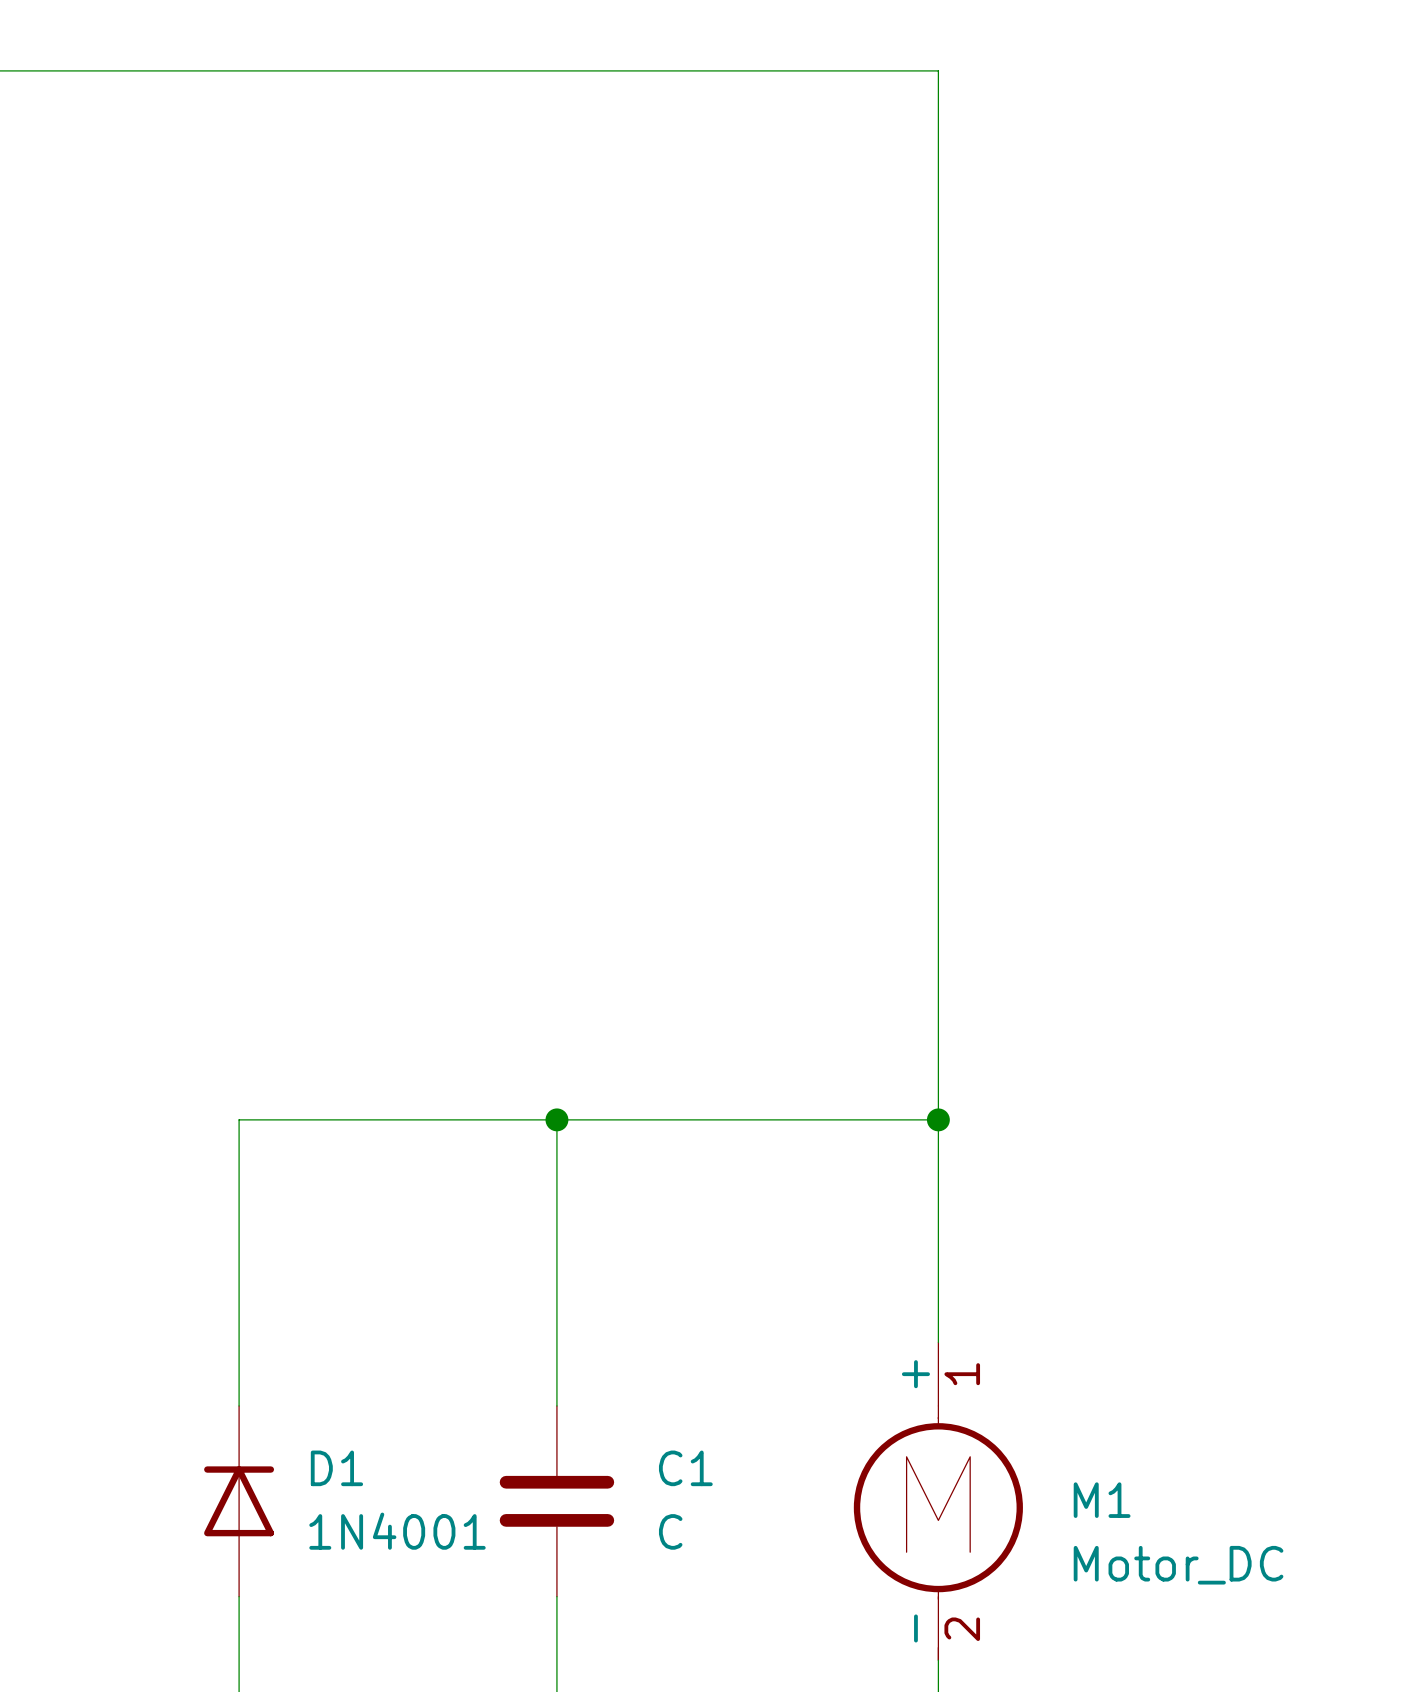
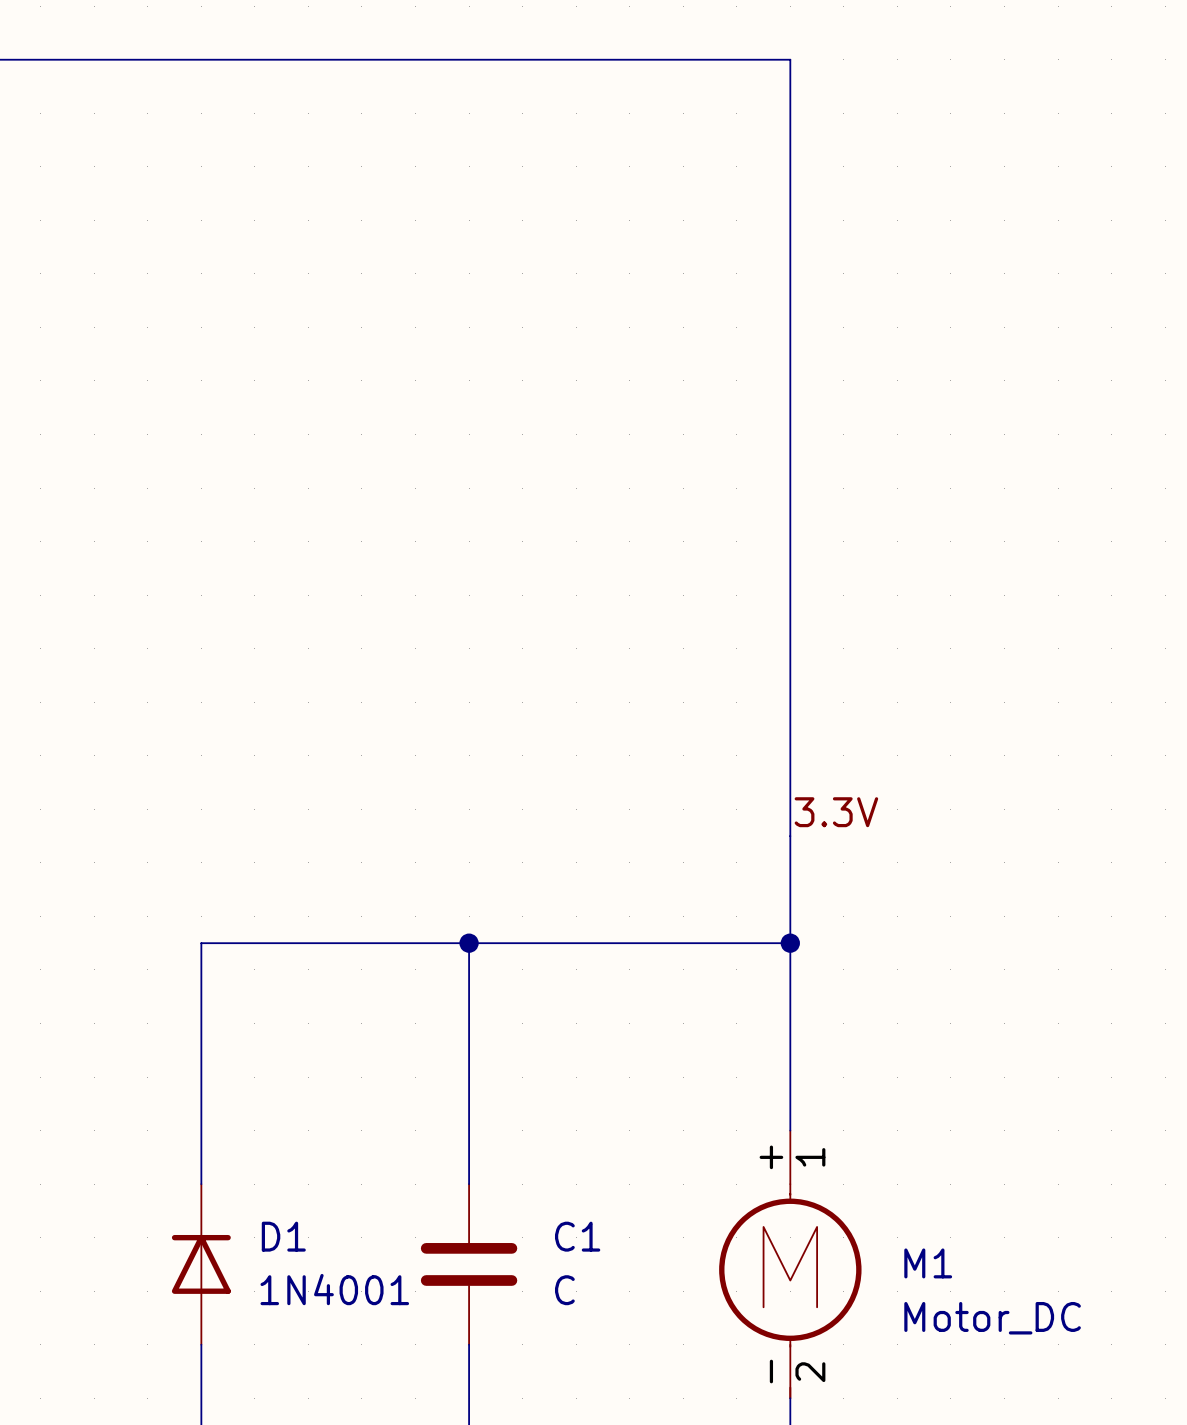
label: none -> 3.3V (836, 812)

